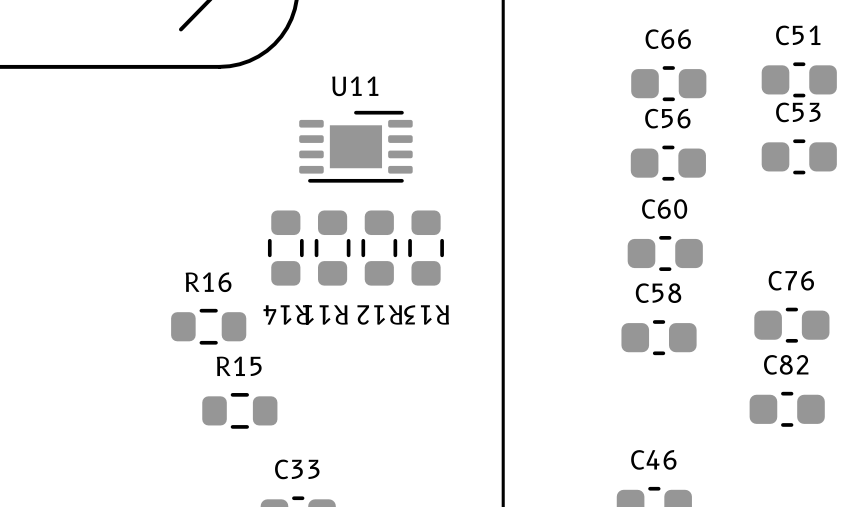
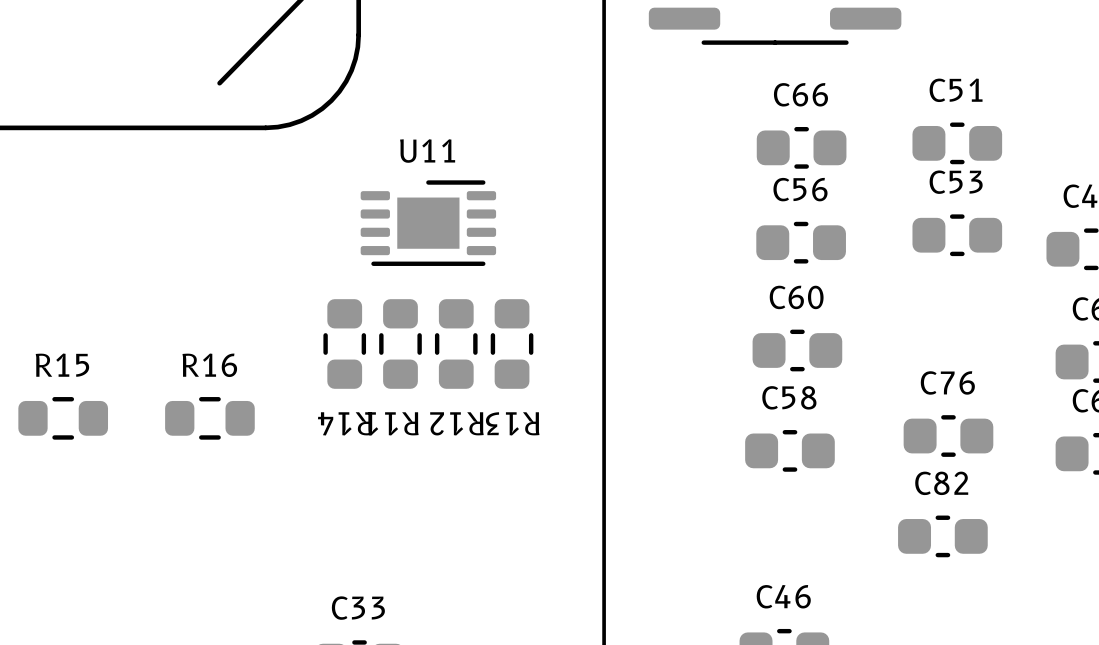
R16 position: (208, 326) -> (209, 418)
R15 position: (239, 410) -> (63, 418)

